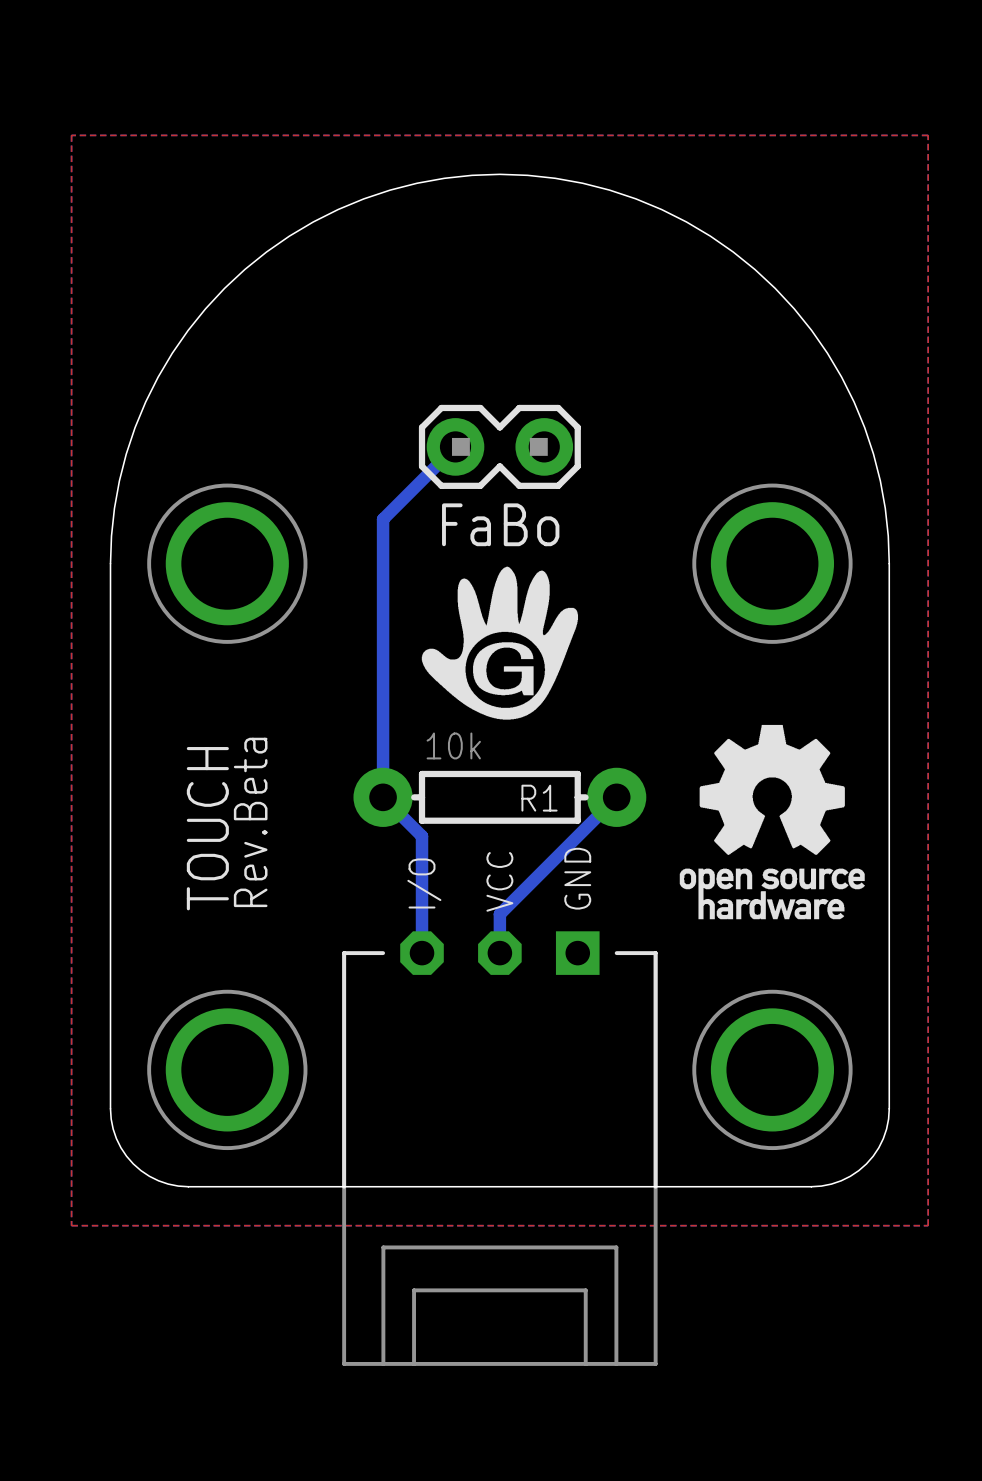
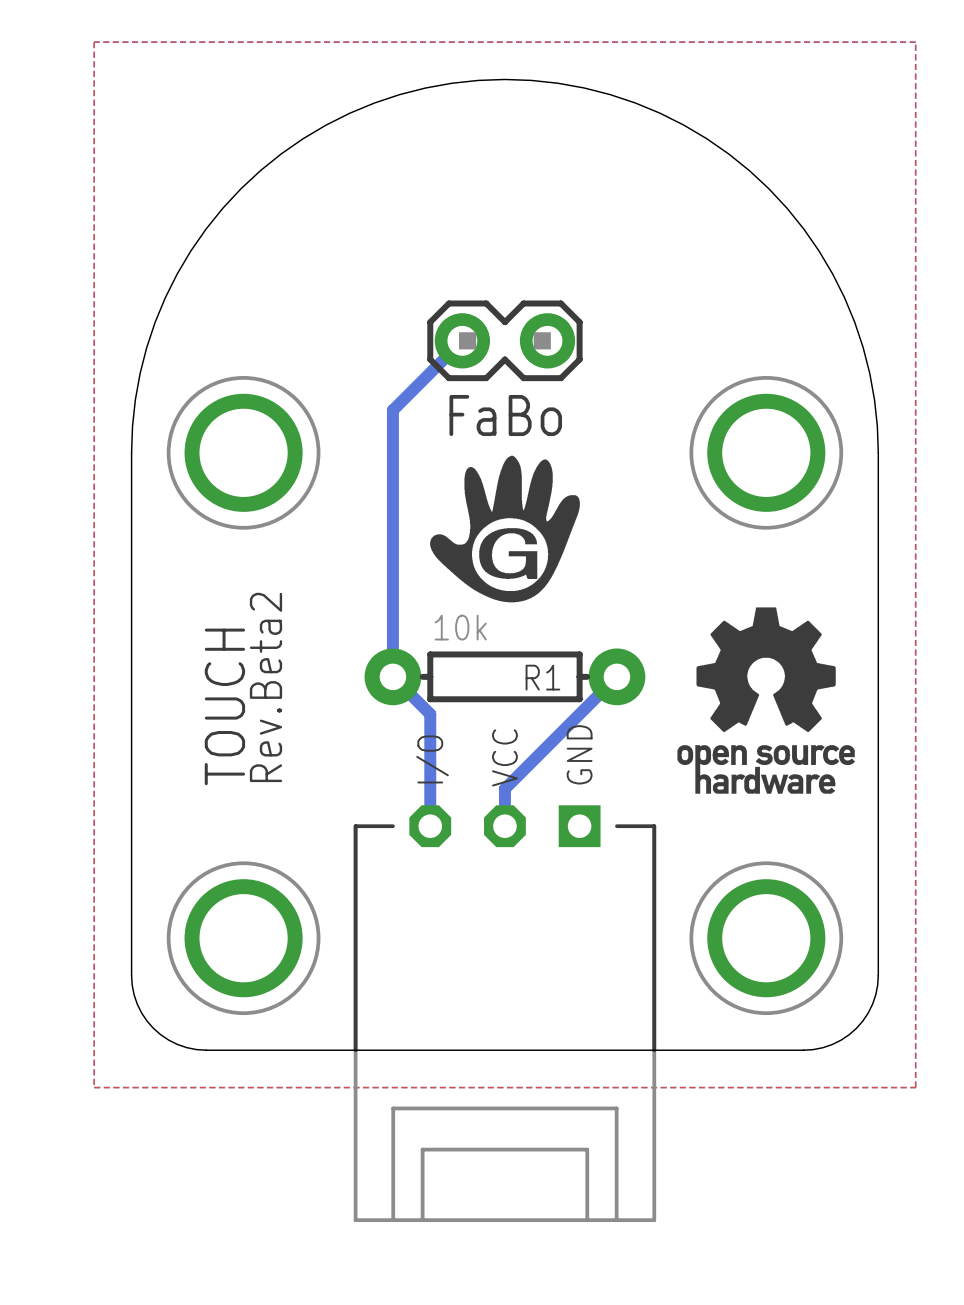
text: Rev.Beta (250, 822) -> Rev.Beta2 (265, 687)

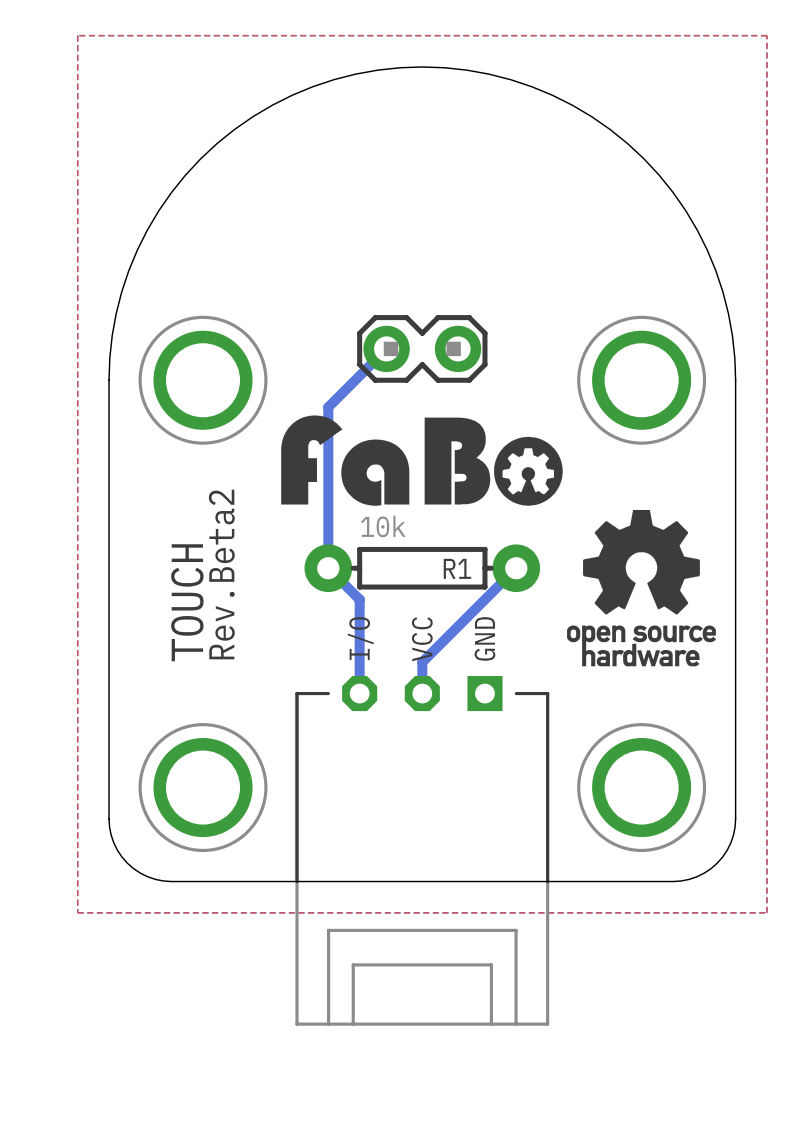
bottom track: (462, 340) (392, 410) (392, 484) -> (386, 348) (328, 407)
part position: (504, 340) -> (422, 348)
drawing shape: [430, 394, 580, 603] -> [281, 415, 563, 506]

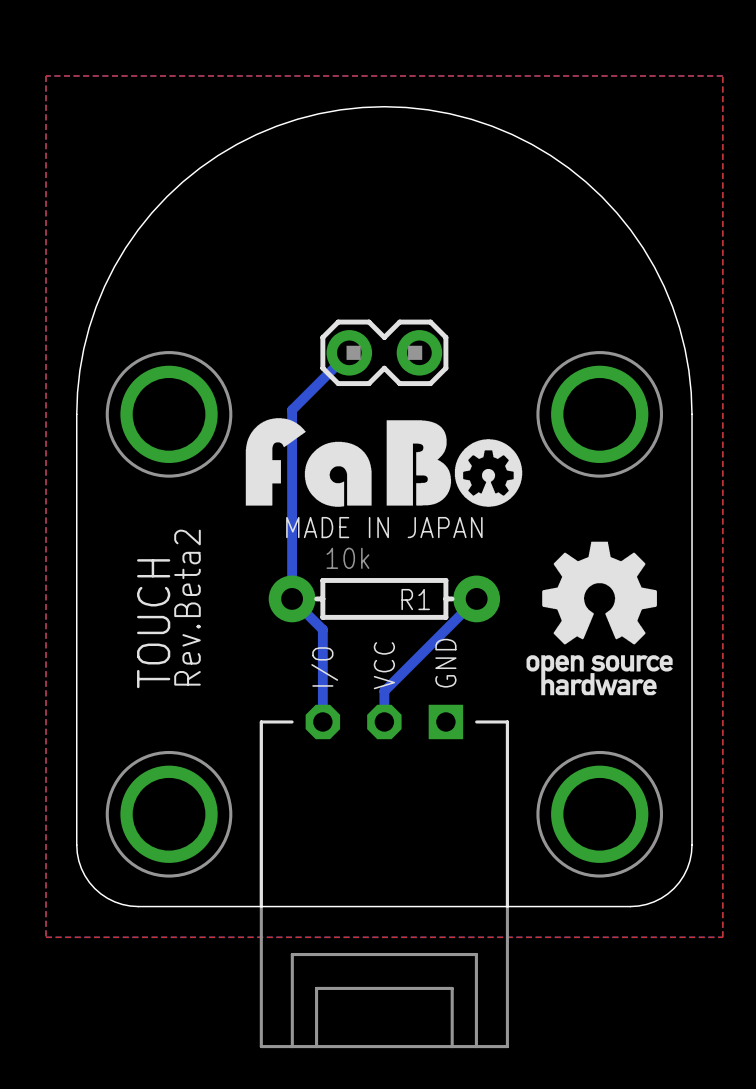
bottom track: (386, 348) (328, 407) -> (349, 352) (292, 410) (292, 440)
part position: (422, 348) -> (384, 352)
drawing position: (421, 460) -> (384, 462)
text: none -> MADE IN JAPAN (384, 527)

